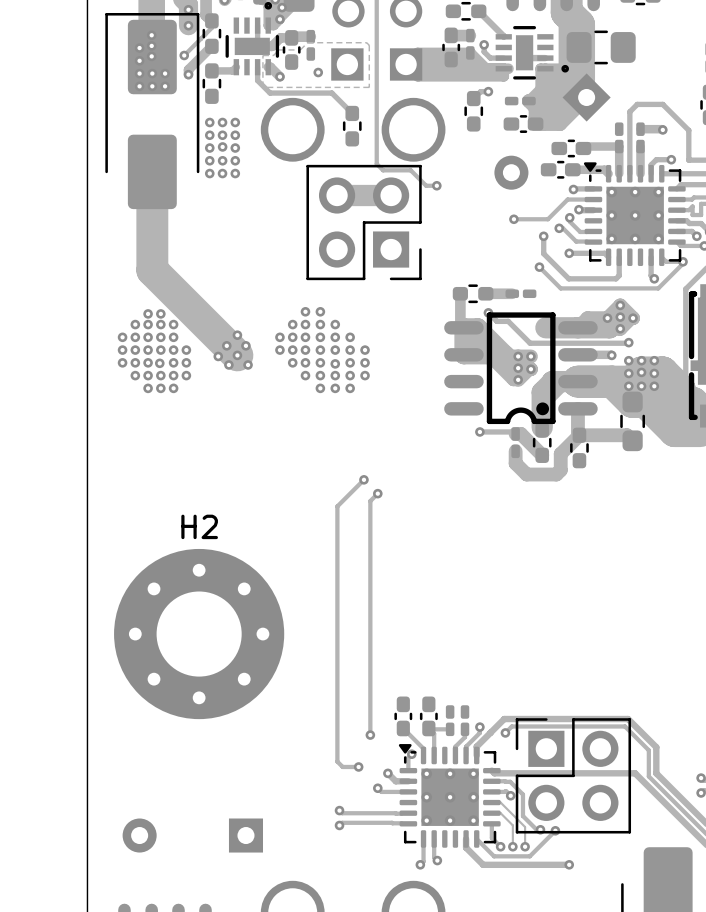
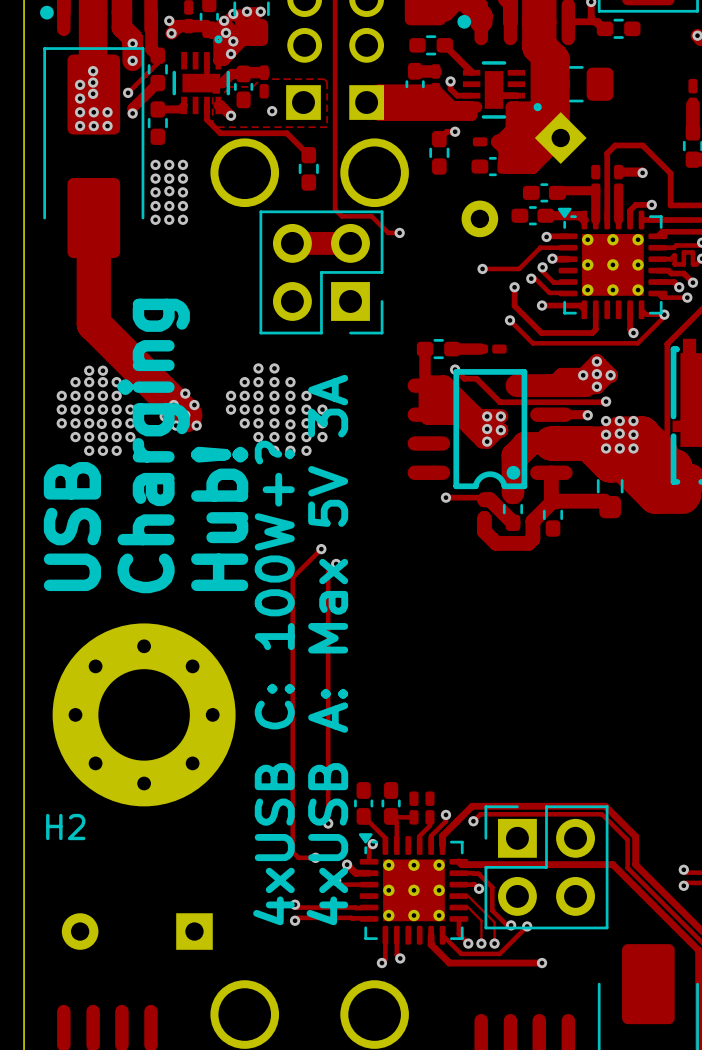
text: none -> Charging (153, 445)
text: none -> Hub! (219, 518)
text: none -> USB (72, 526)
H2 name position: H2 (199, 526) -> H2 (65, 827)
text: none -> 4xUSB A: Max 5V 3A (327, 650)
text: none -> 4xUSB C: 100W+? (273, 682)

